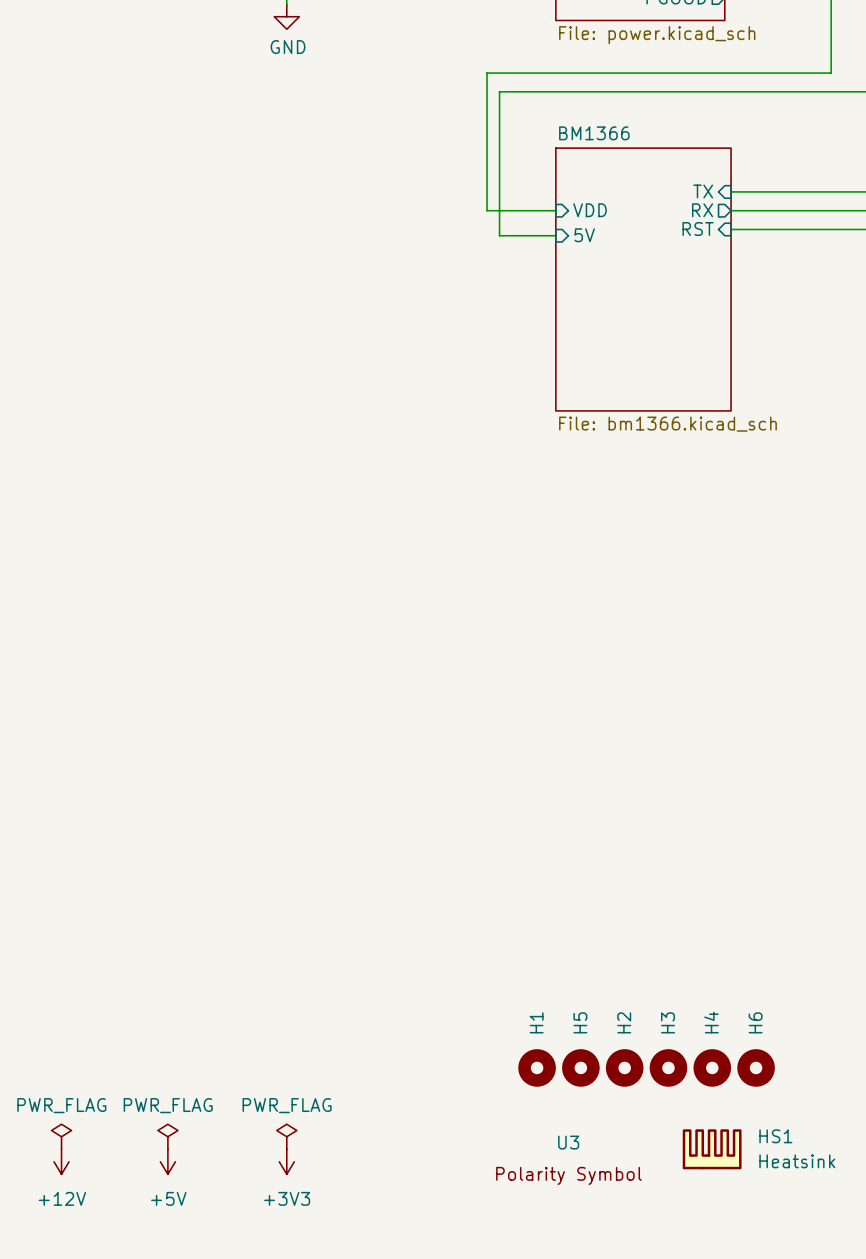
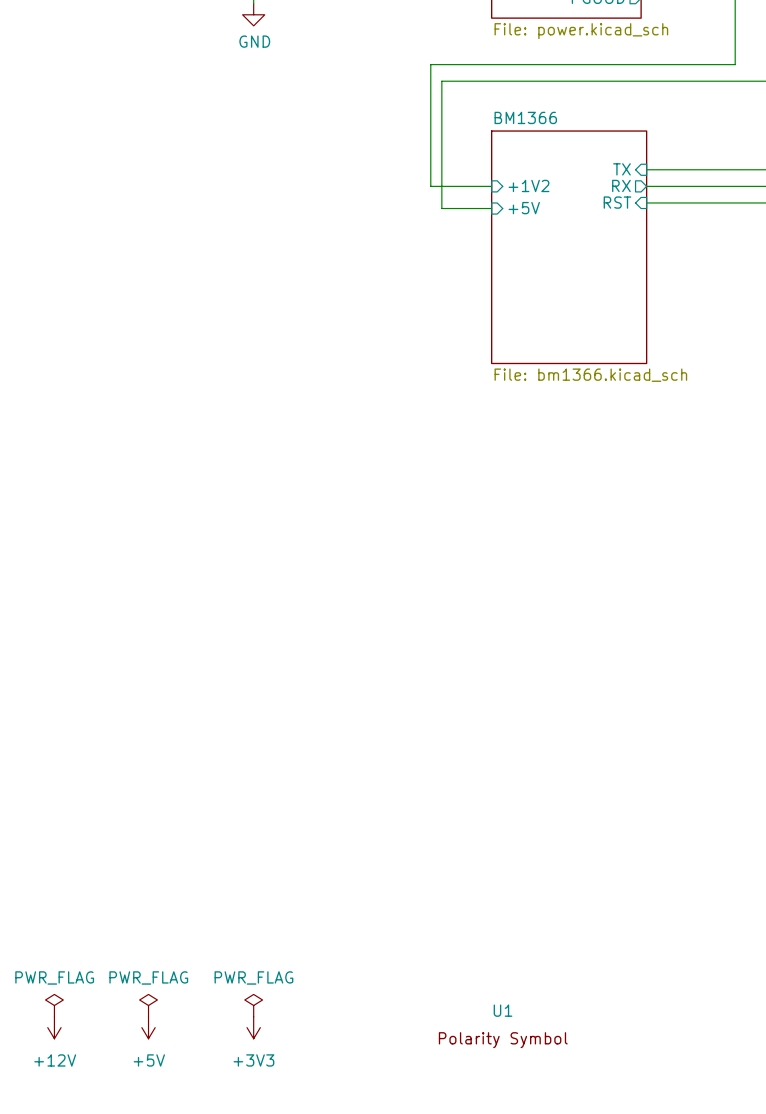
sheet pin: VDD (590, 210) -> +1V2 (529, 185)
sheet pin: 5V (584, 235) -> +5V (524, 208)
H1: (537, 1067) -> none
H5: (580, 1067) -> none
H2: (624, 1067) -> none
H3: (668, 1067) -> none
H4: (712, 1067) -> none
H6: (756, 1067) -> none
U3 name: U3 (568, 1142) -> U1 (503, 1010)
HS1: Heatsink (712, 1149) -> none

